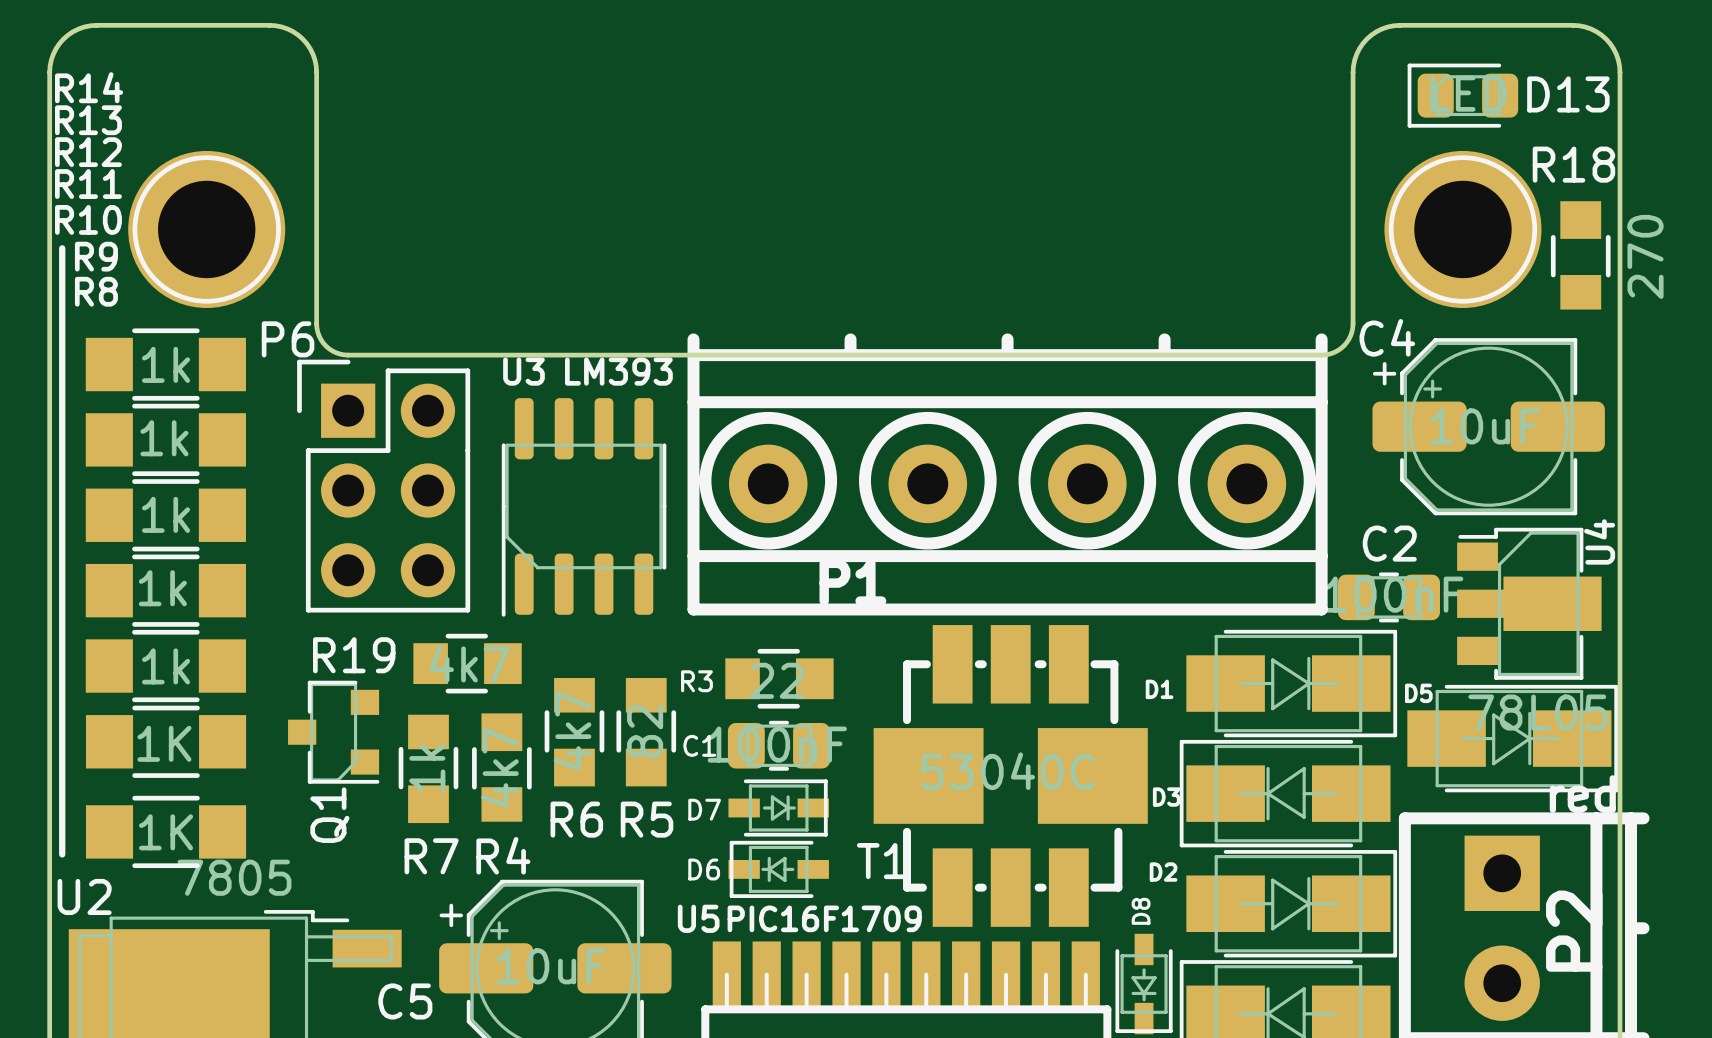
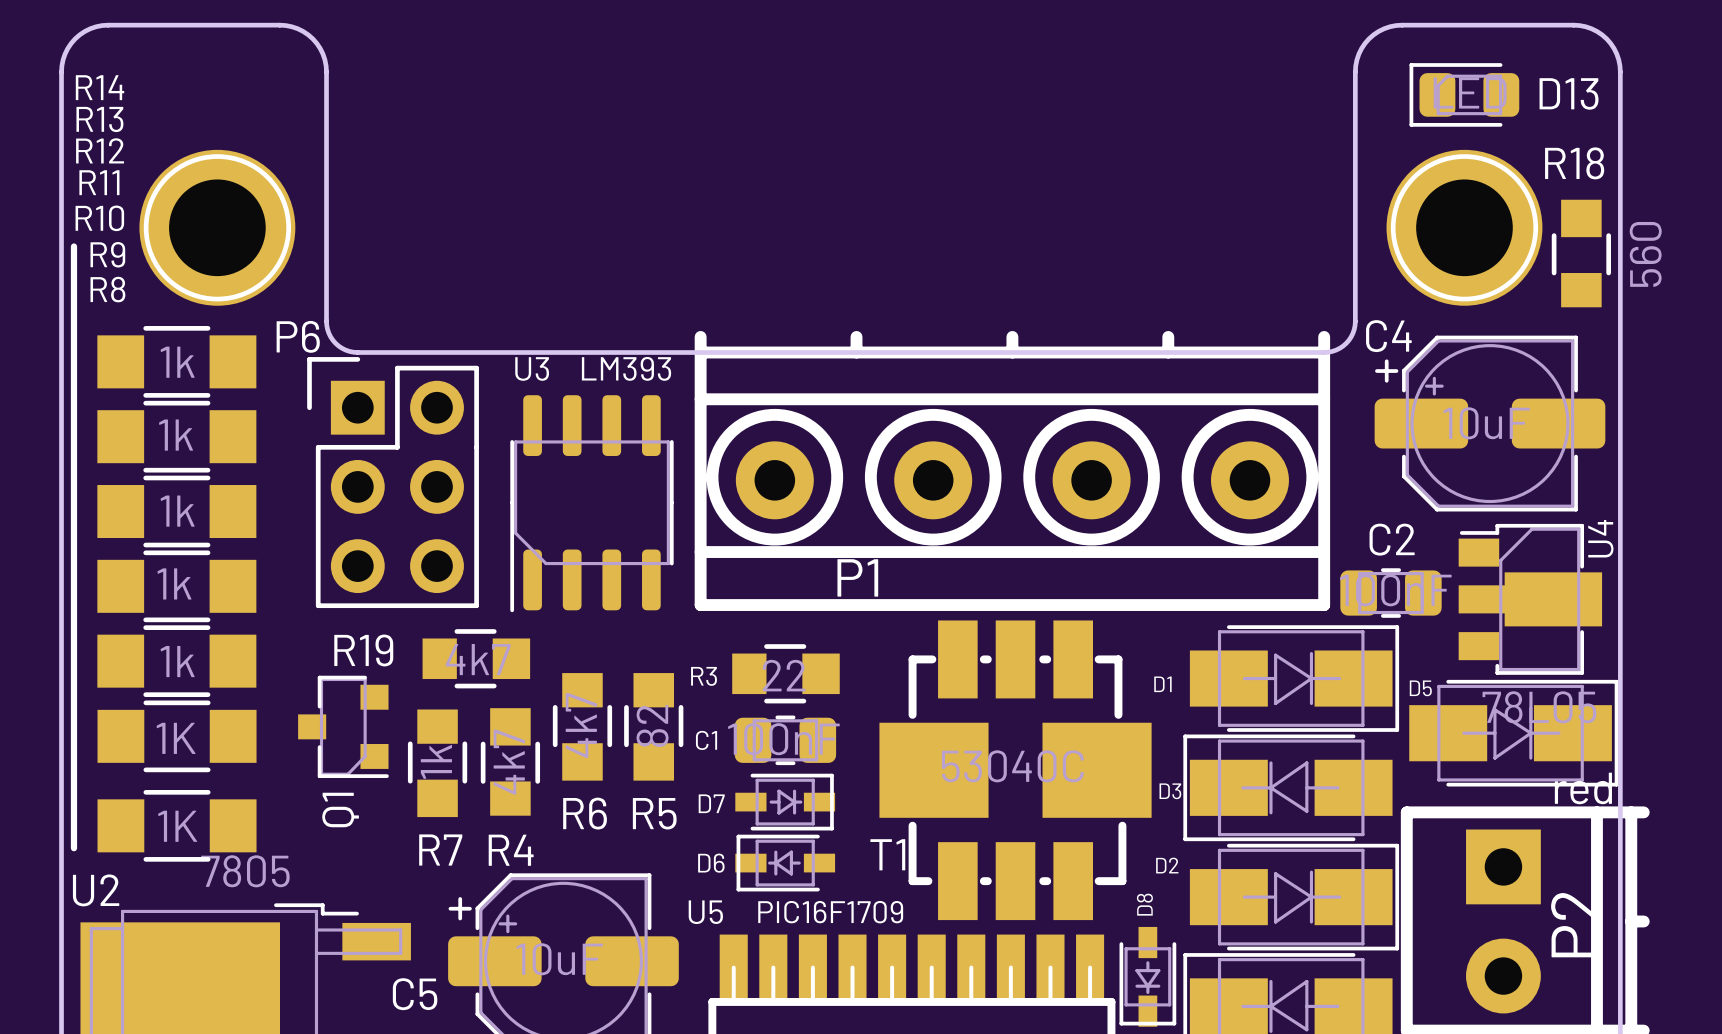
R18 value: 270 (1645, 256) -> 560 (1645, 254)

